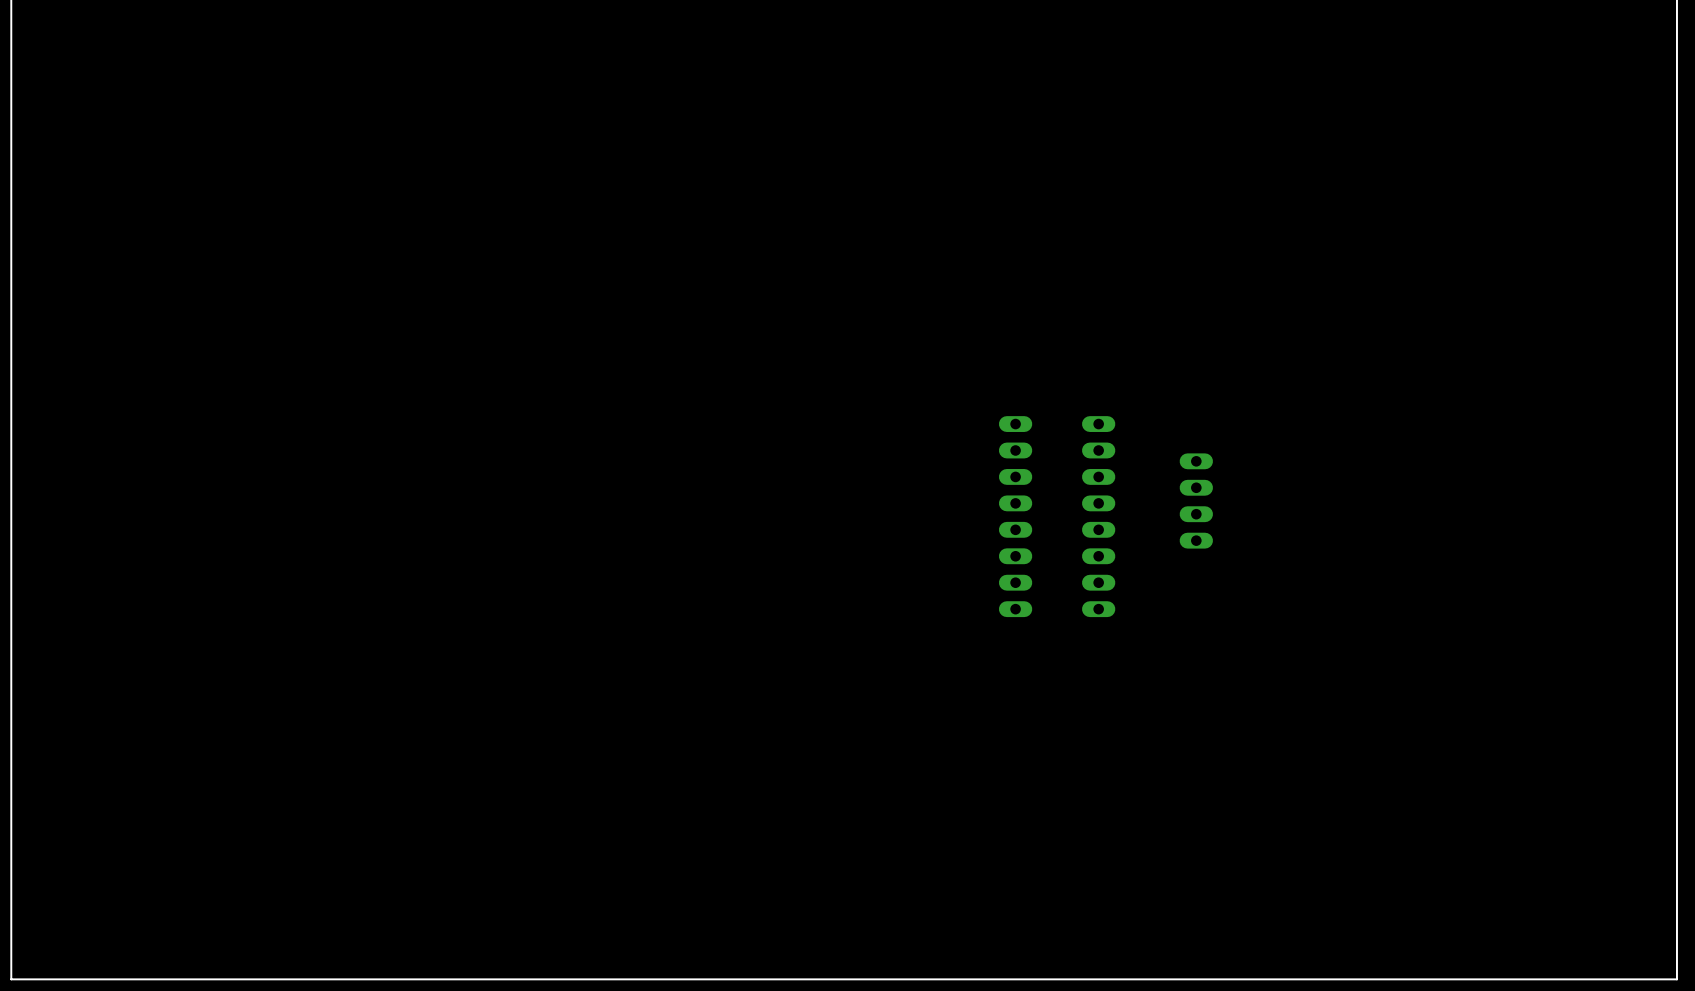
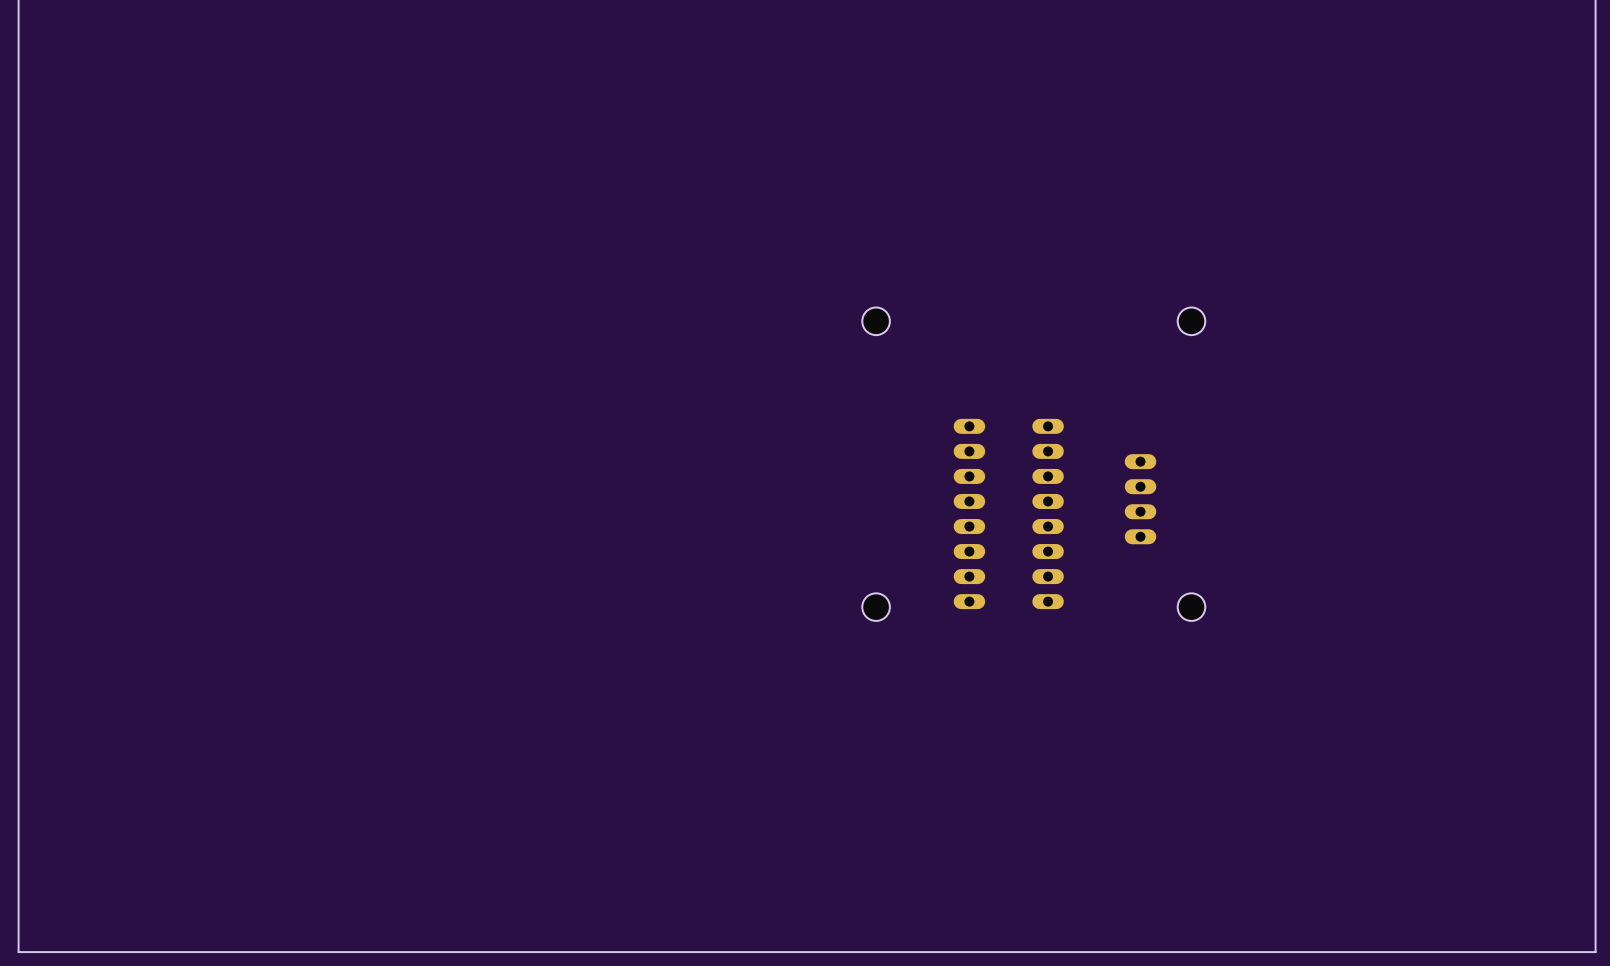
hole: none -> (876, 321)
hole: none -> (1191, 321)
hole: none -> (876, 607)
hole: none -> (1191, 607)

